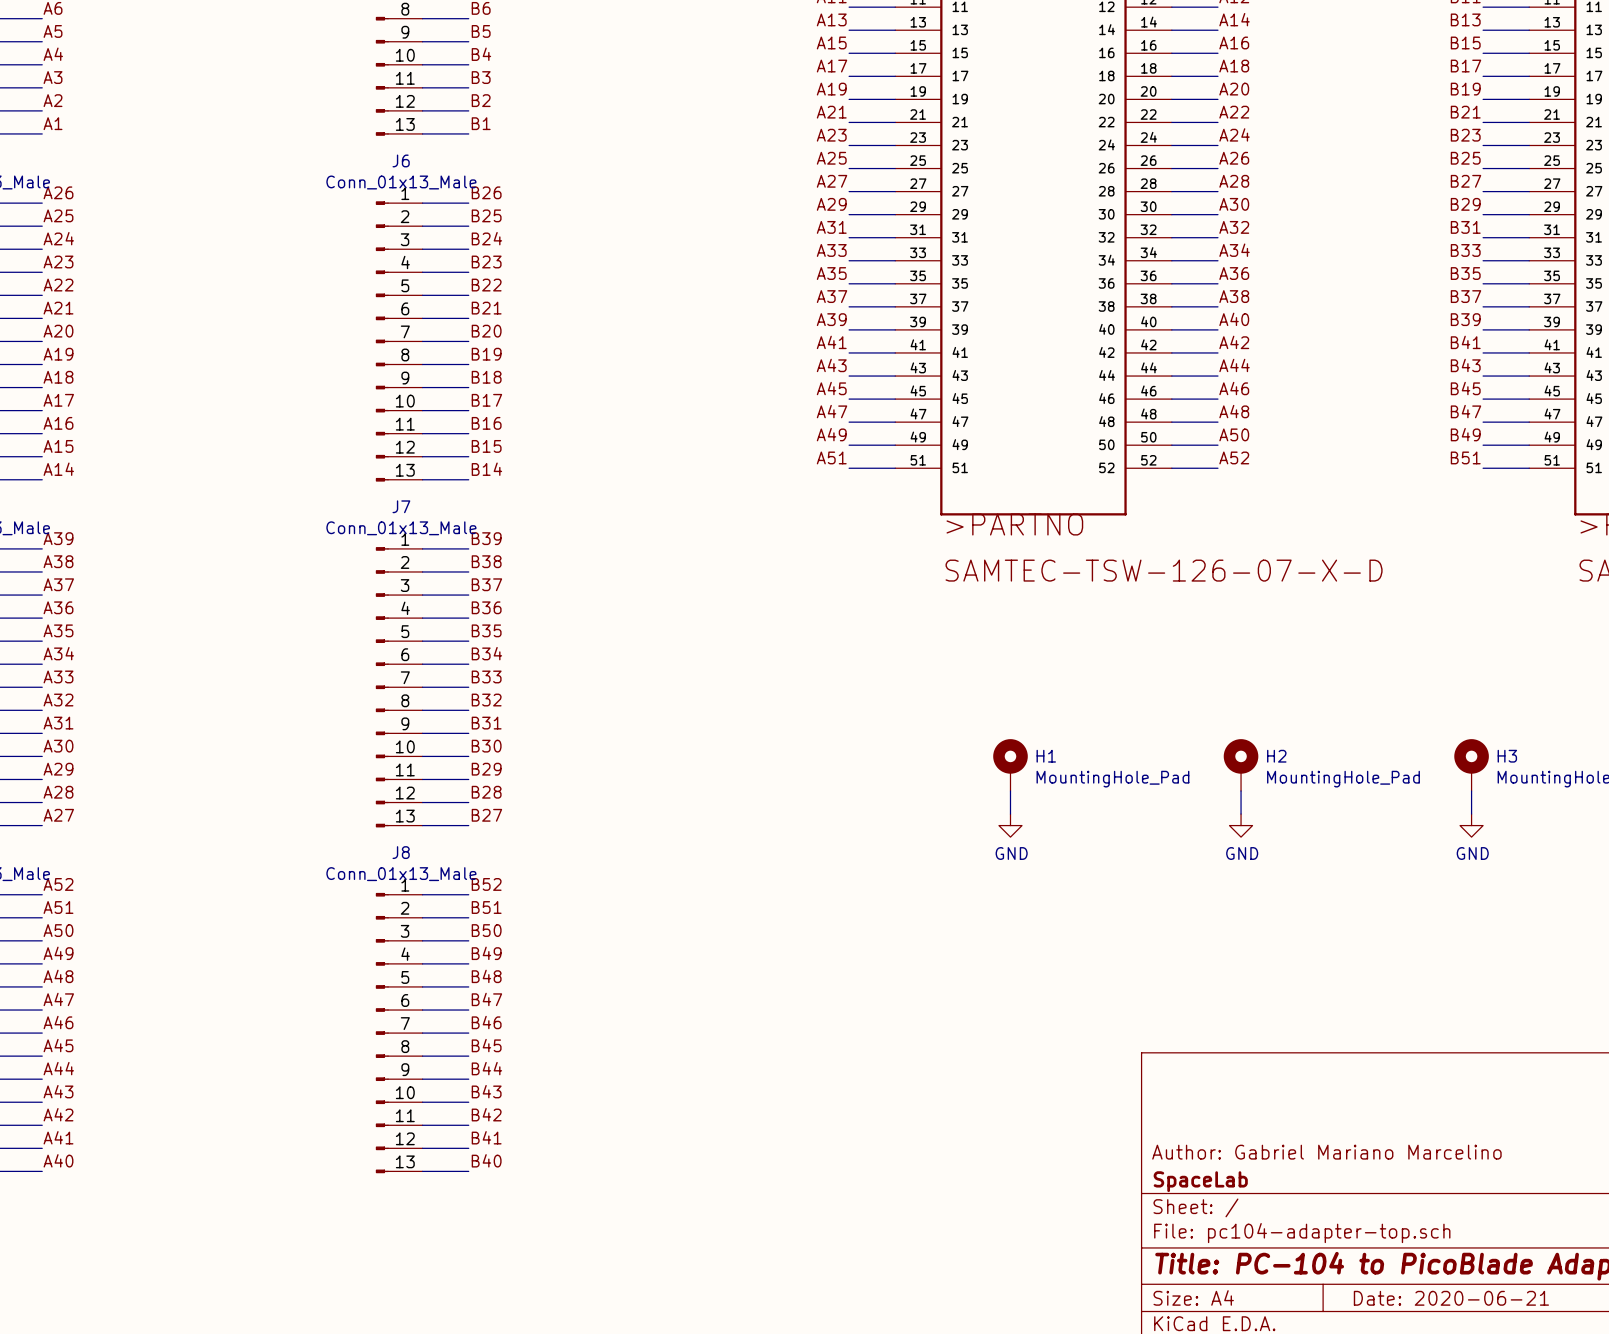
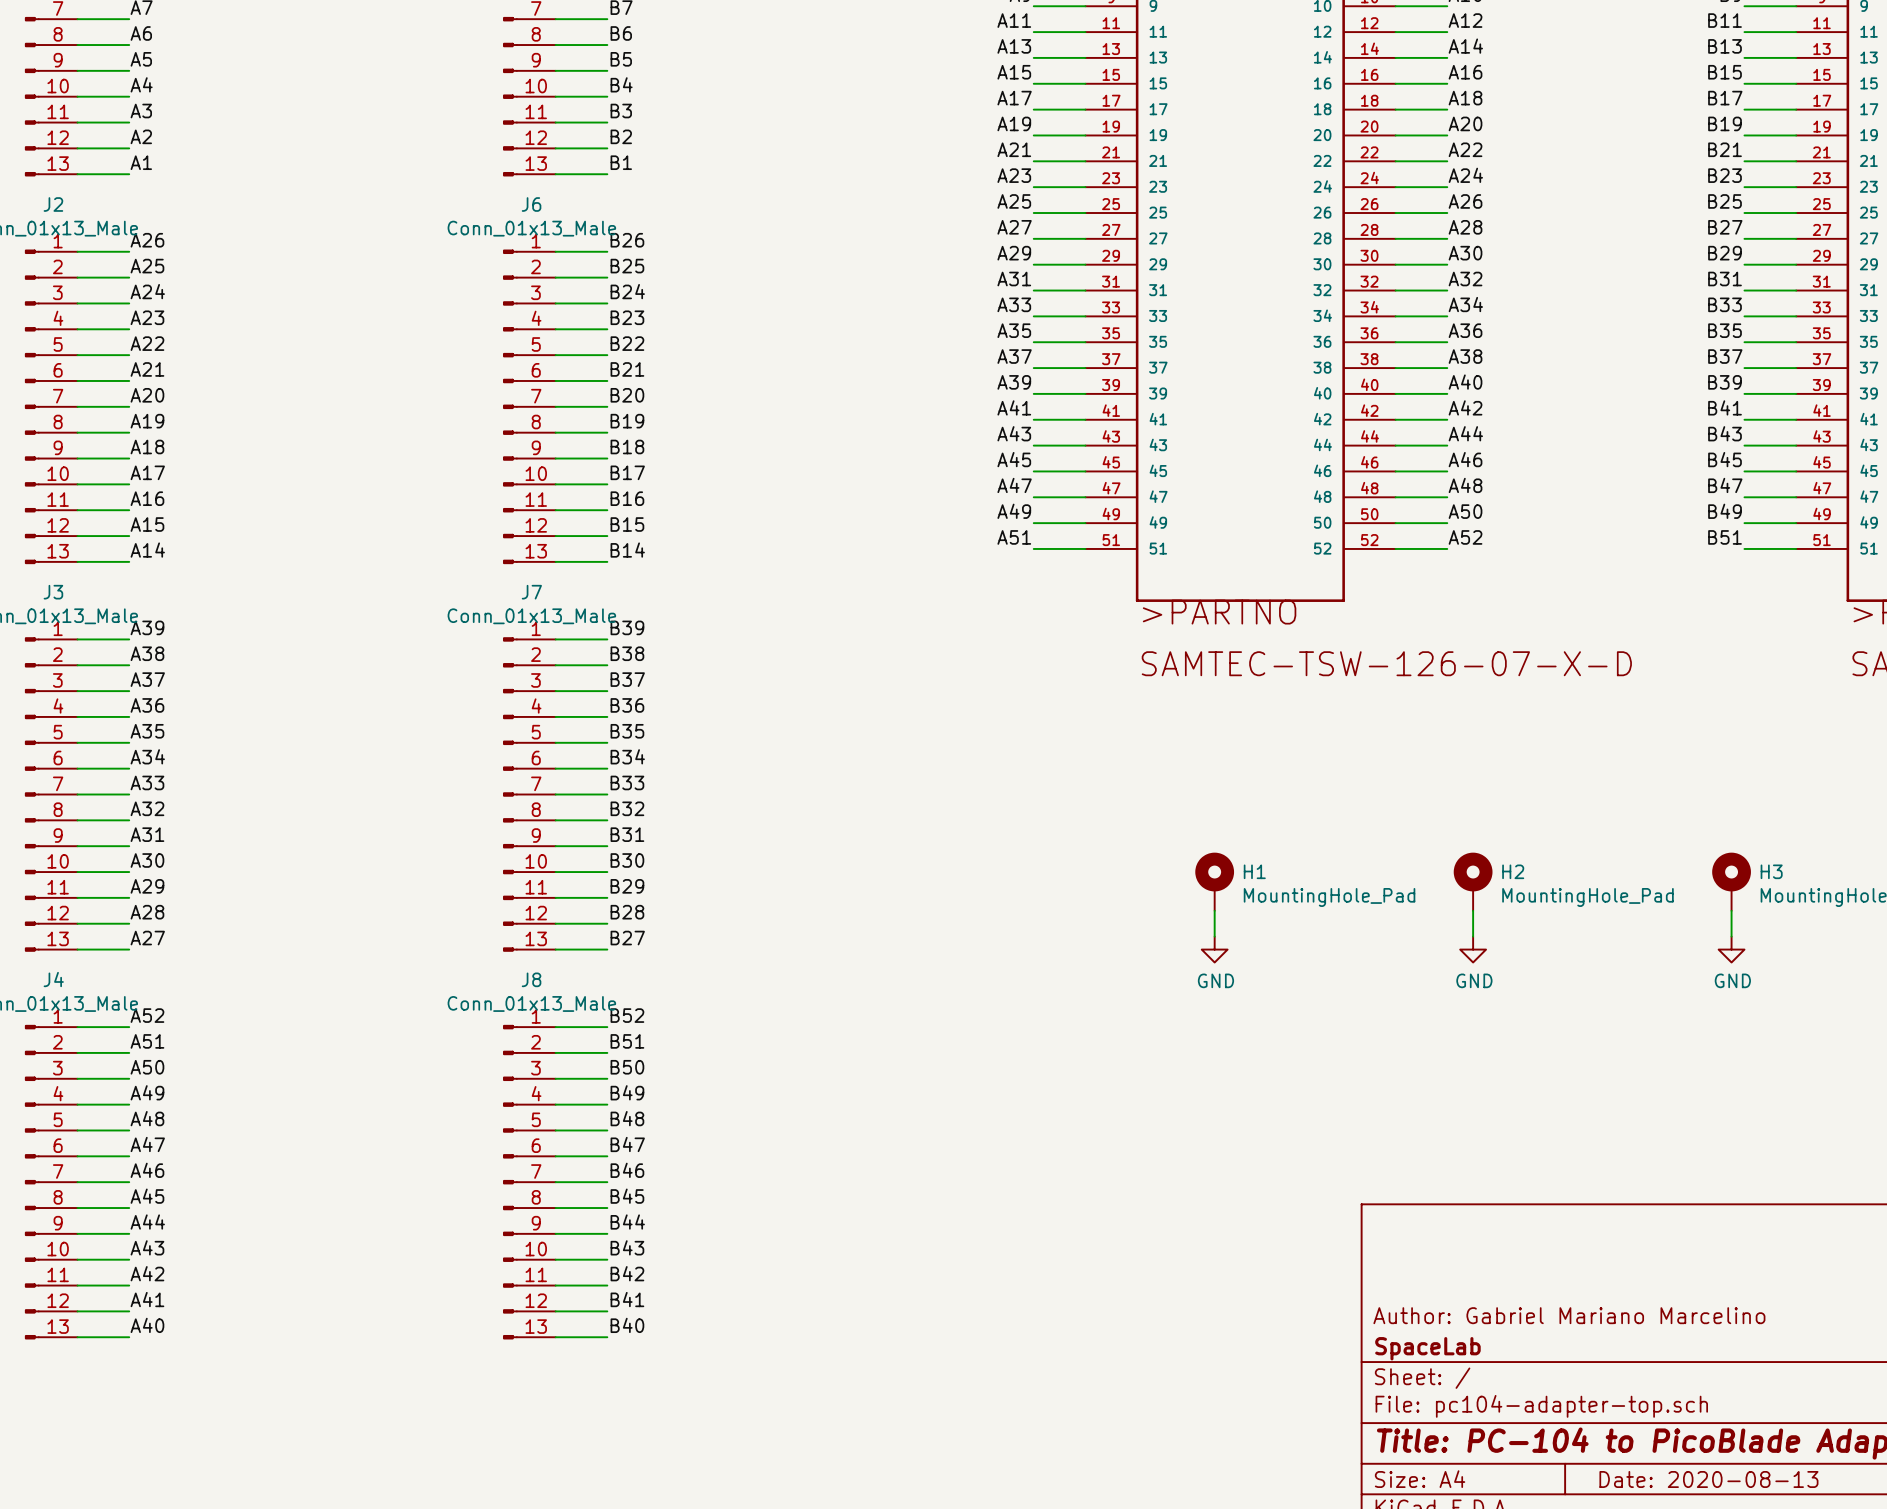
title block: Date: 2020-06-21 (1451, 1298) -> Date: 2020-08-13 (1708, 1479)

